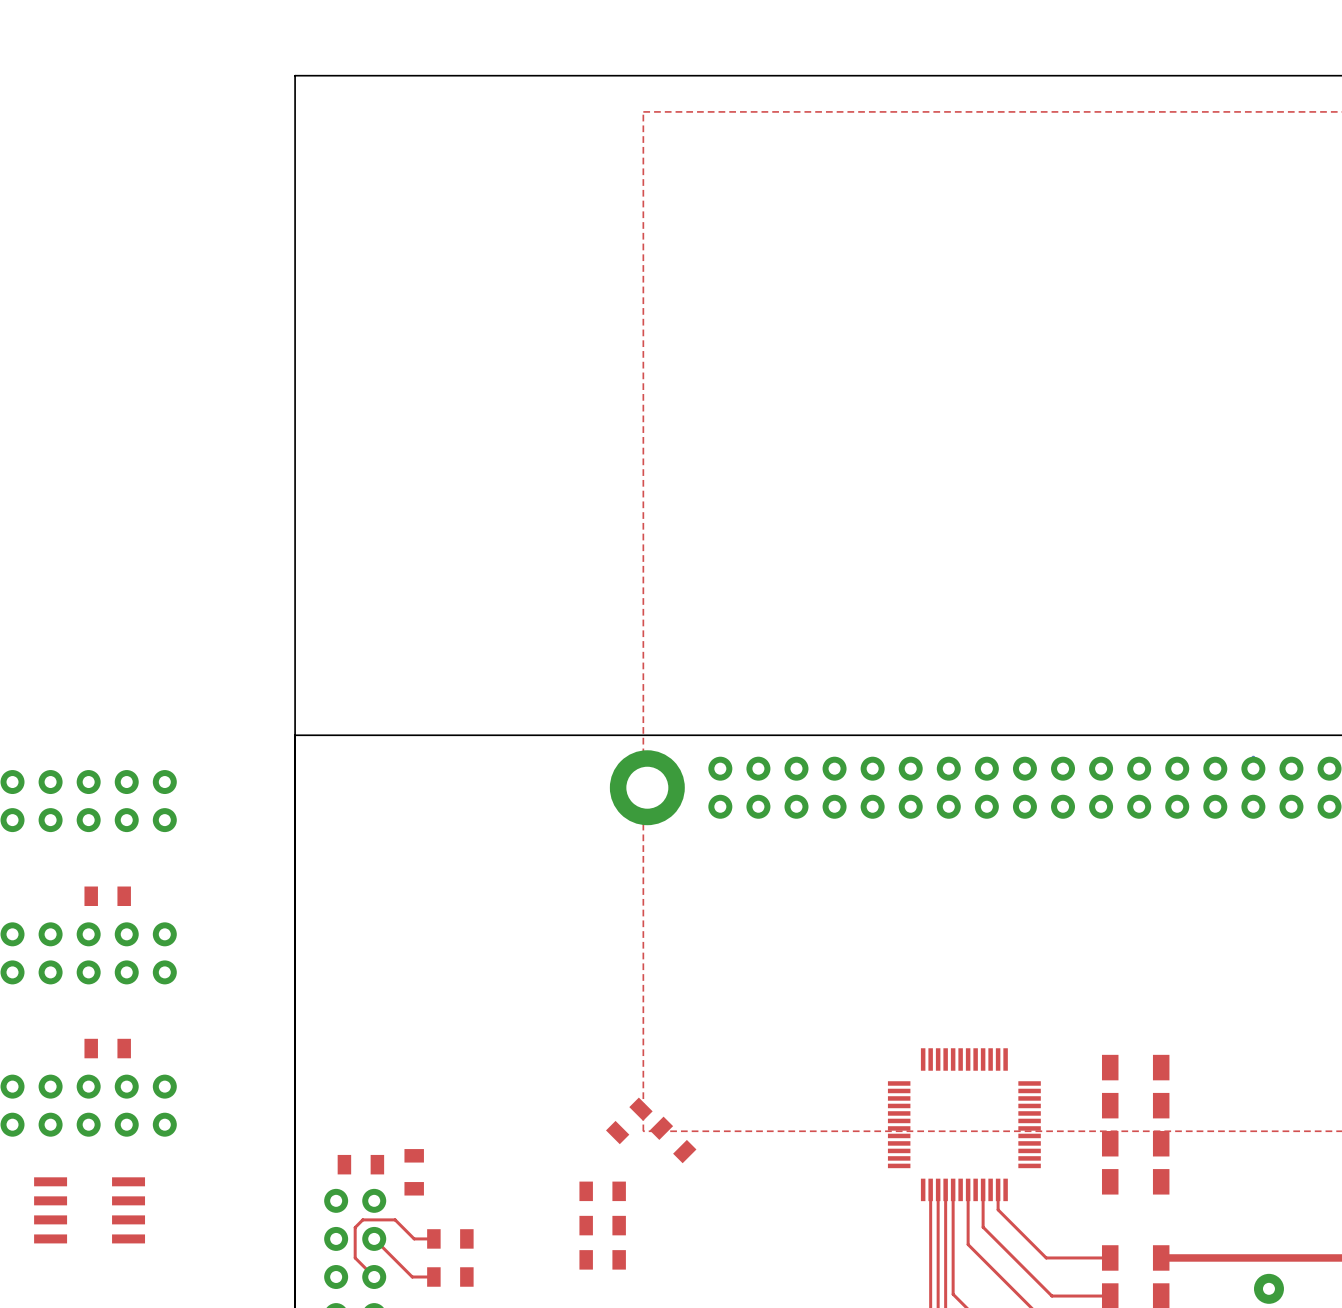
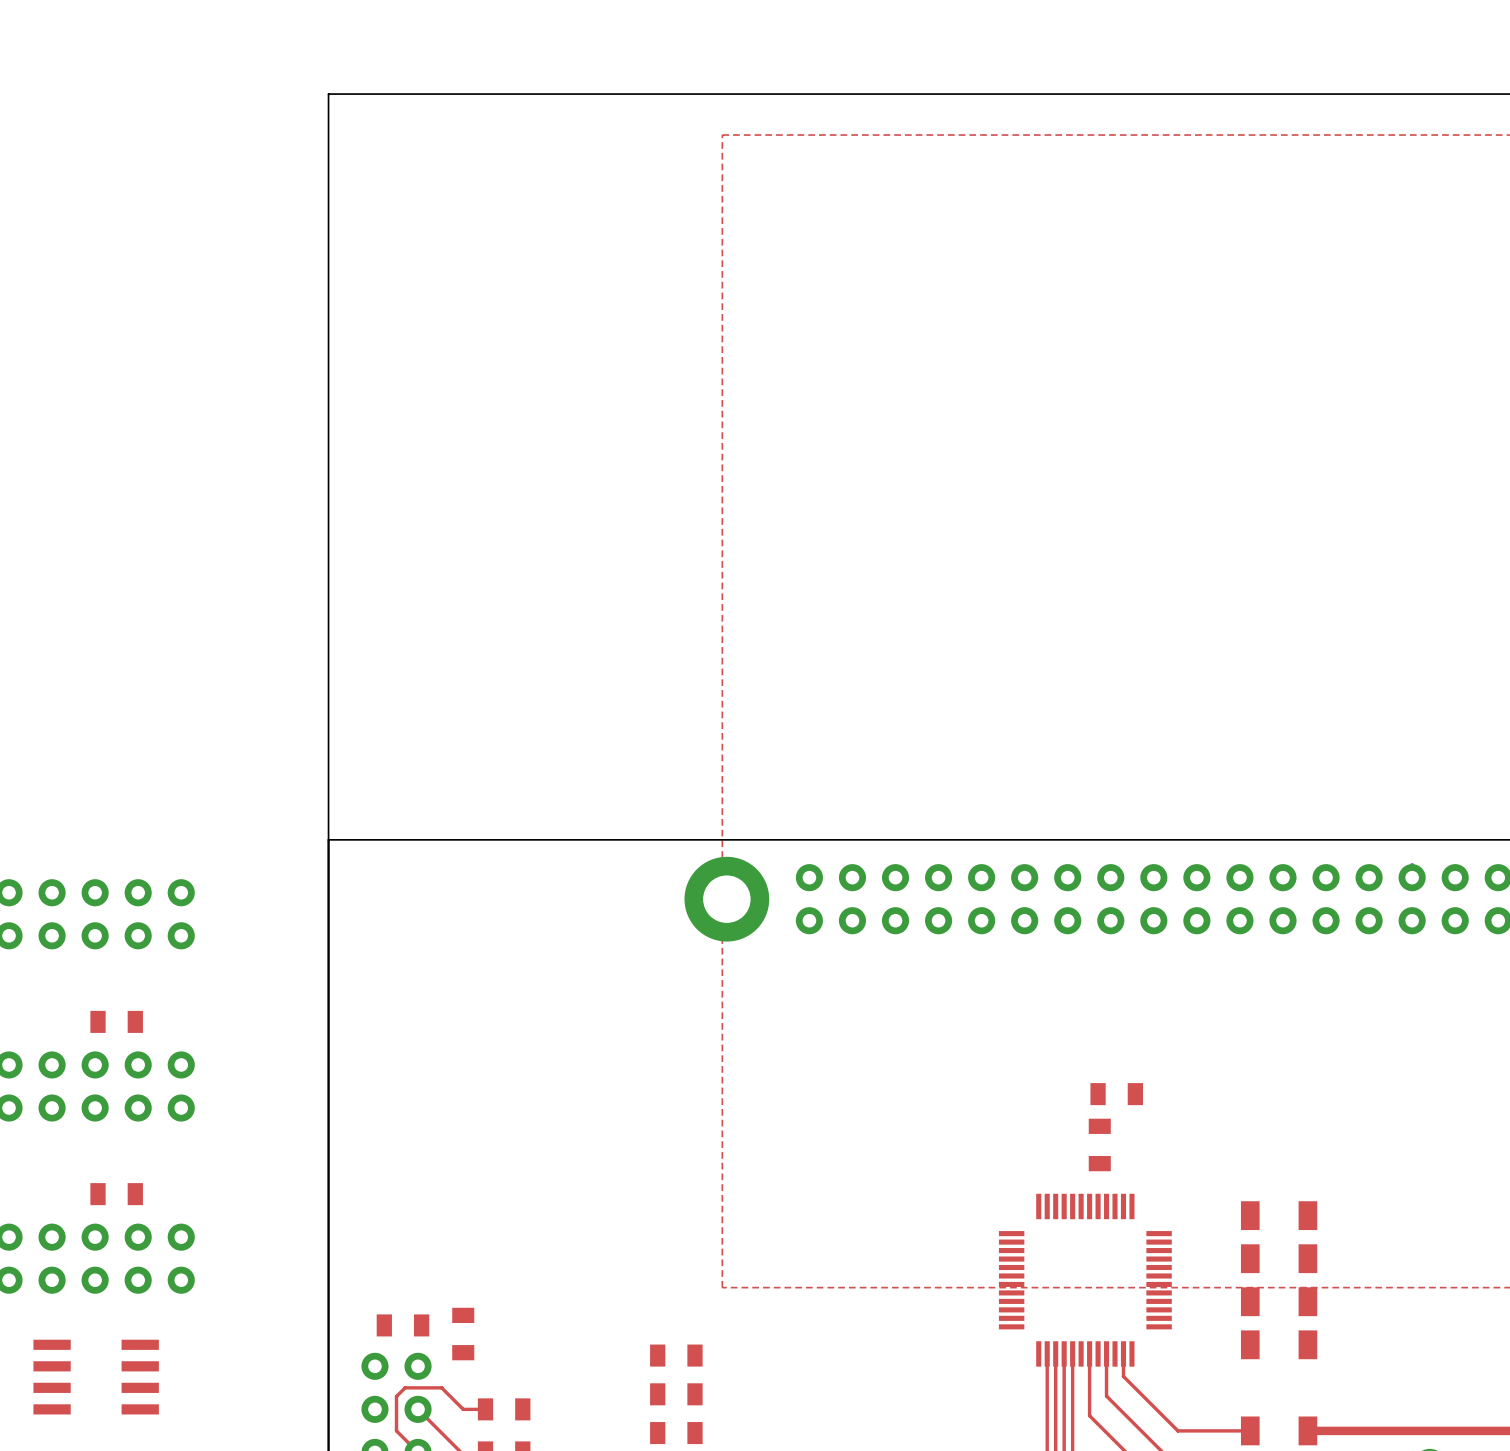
part: none -> (1116, 1094)
part: none -> (1099, 1144)
part: (629, 1120) -> none
part: (673, 1139) -> none

